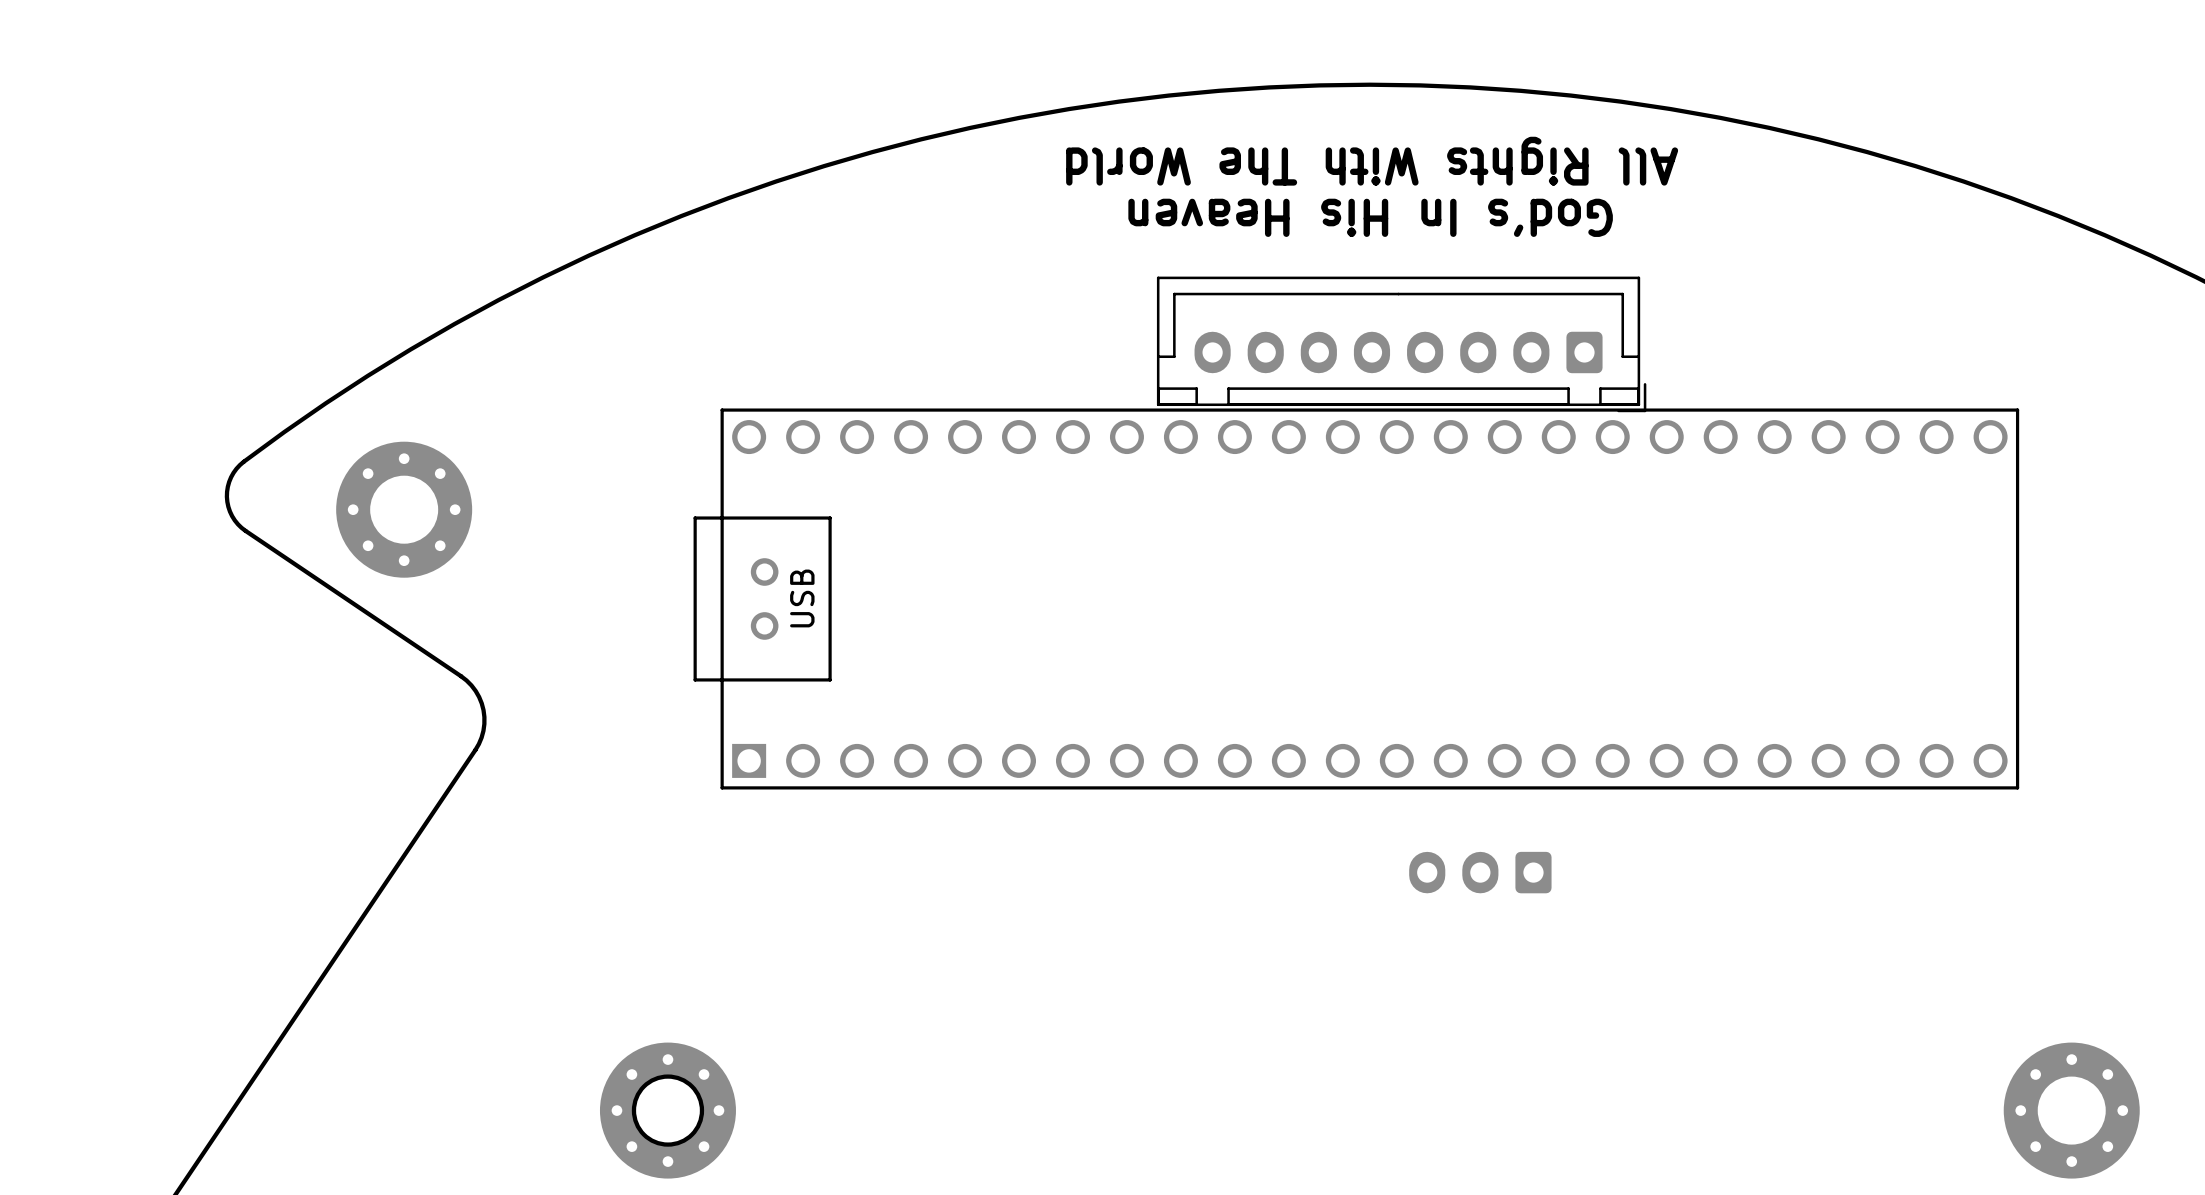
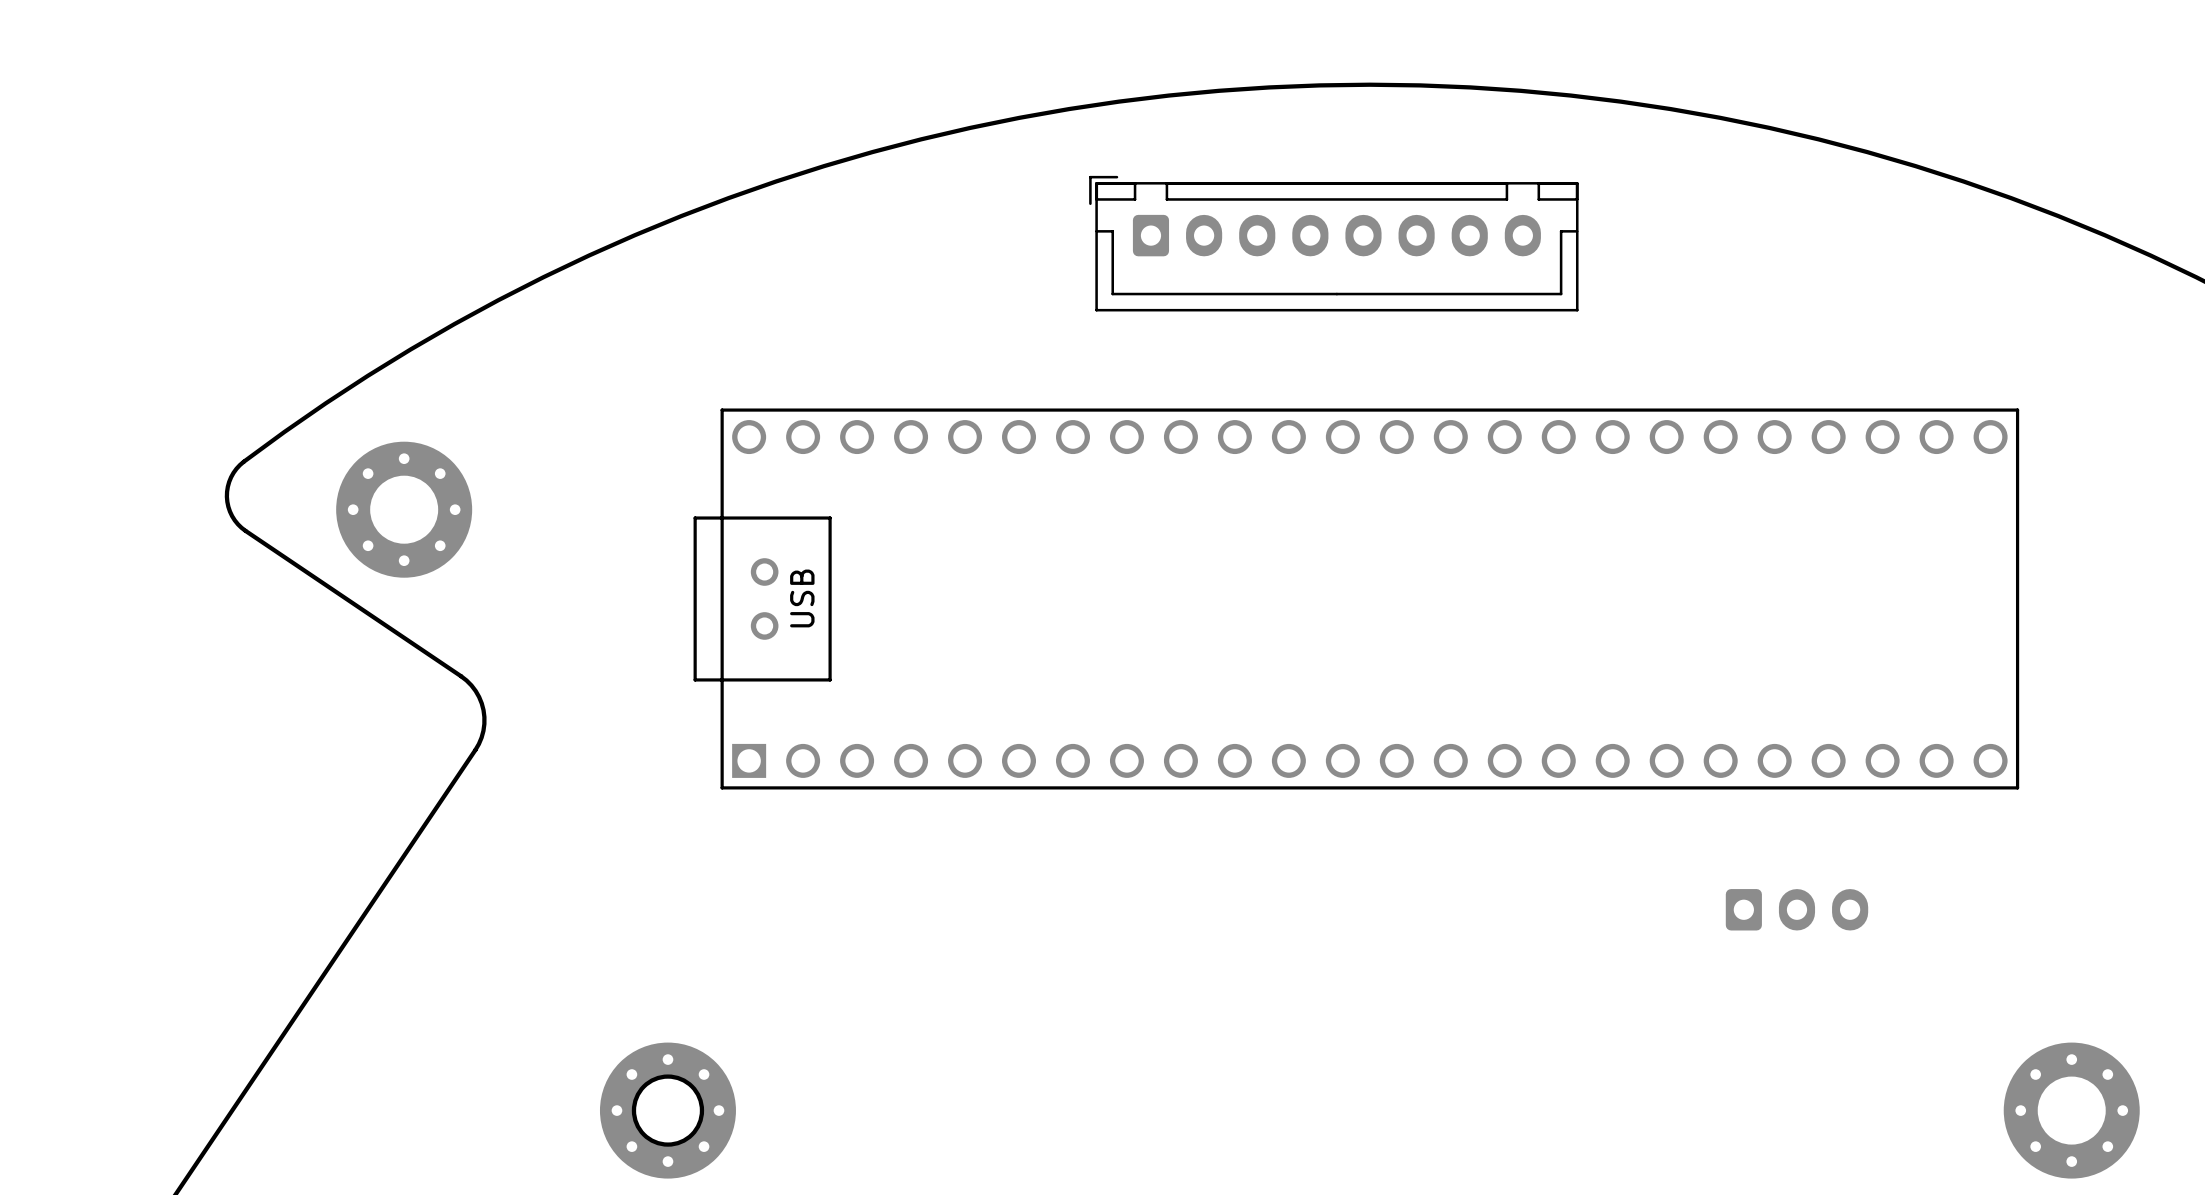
text: All Rights With The World (1372, 161) -> none
text: God's In His Heaven (1370, 217) -> none
part rotation: 0° (1401, 344) -> 180° (1333, 243)
part rotation: 0° (1480, 872) -> 180° (1796, 909)
part position: (1480, 872) -> (1796, 909)

